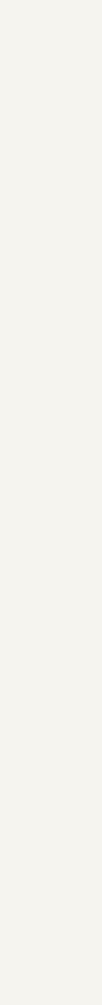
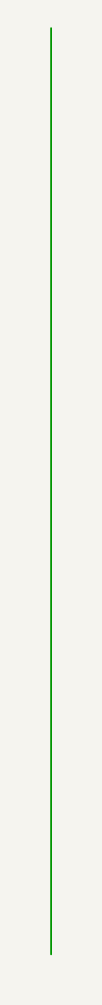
wire: none -> (51, 28) (51, 954)

